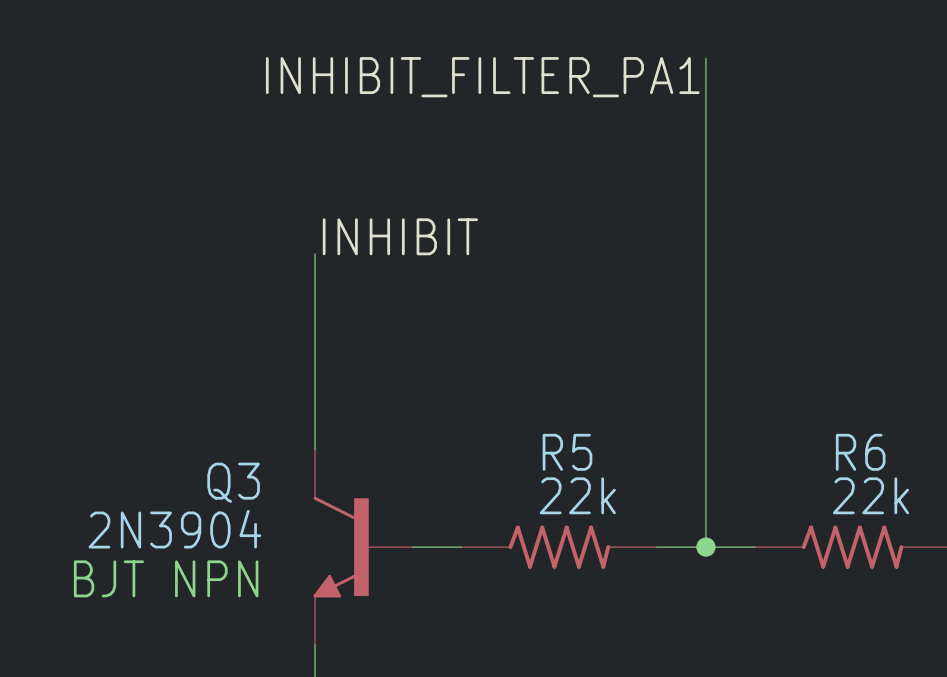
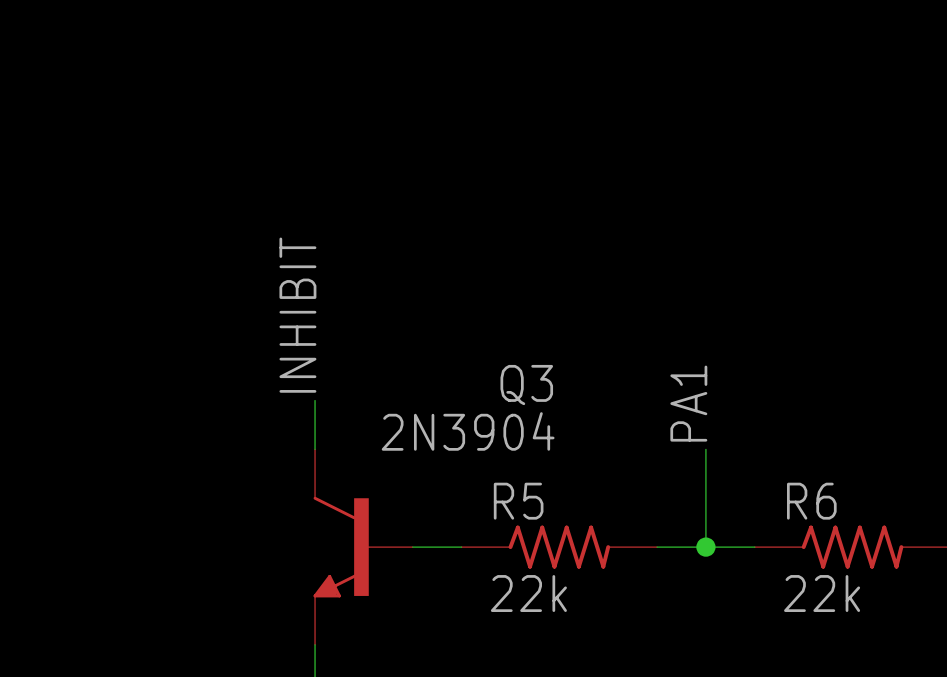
wire: (705, 58) (705, 449) -> none
label: INHIBIT_FILTER_PA1 (482, 77) -> none
label rotation: 0° (400, 236) -> 90° counterclockwise (297, 315)
wire: (315, 253) (315, 400) -> none
label: none -> PA1 (688, 403)
R5 name position: R5 (567, 452) -> R5 (518, 501)
R6 name position: R6 (860, 452) -> R6 (811, 501)
Q3 name position: Q3 (233, 482) -> Q3 (526, 385)
R5 value position: 22k (577, 495) -> 22k (528, 593)
R6 value position: 22k (870, 495) -> 22k (822, 593)
Q3 value position: 2N3904 (174, 529) -> 2N3904 (468, 431)
text: BJT NPN (166, 578) -> none

